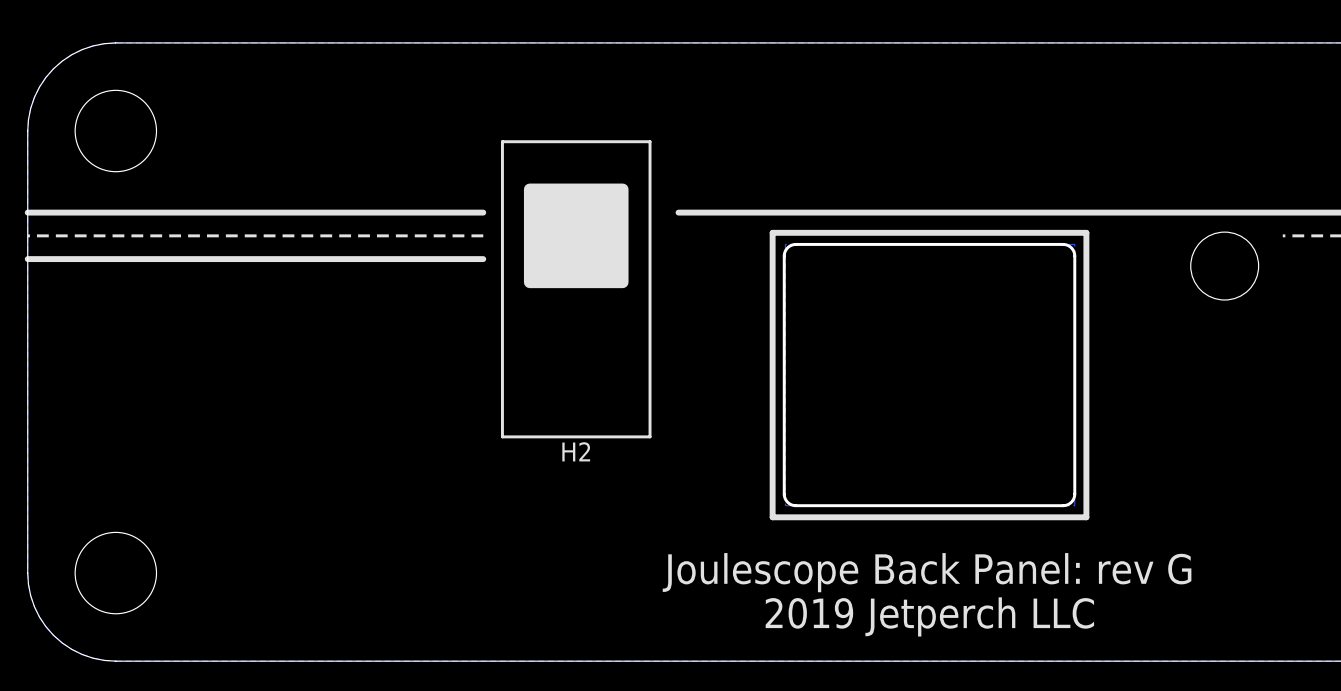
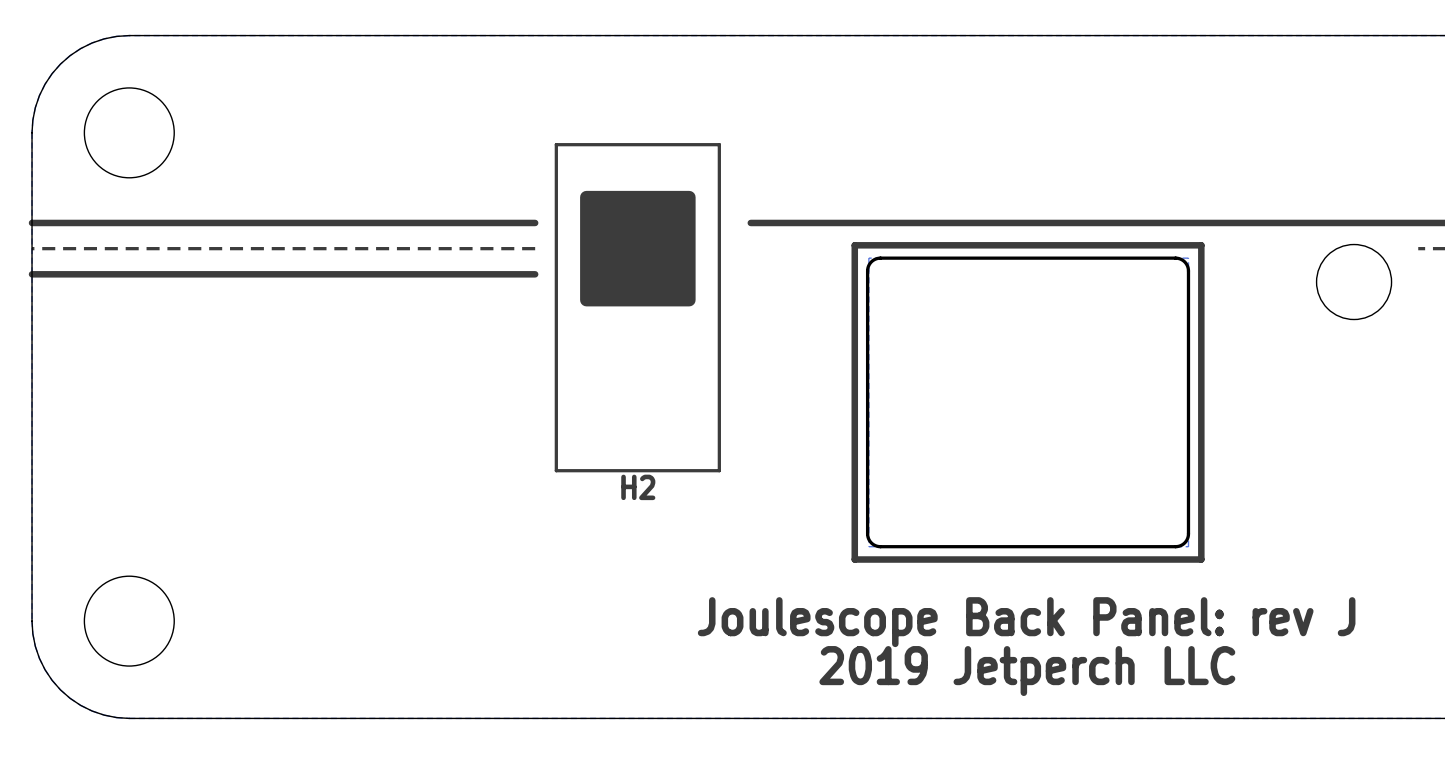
text: Joulescope Back Panel: rev G (927, 572) -> Joulescope Back Panel: rev J (1026, 622)

